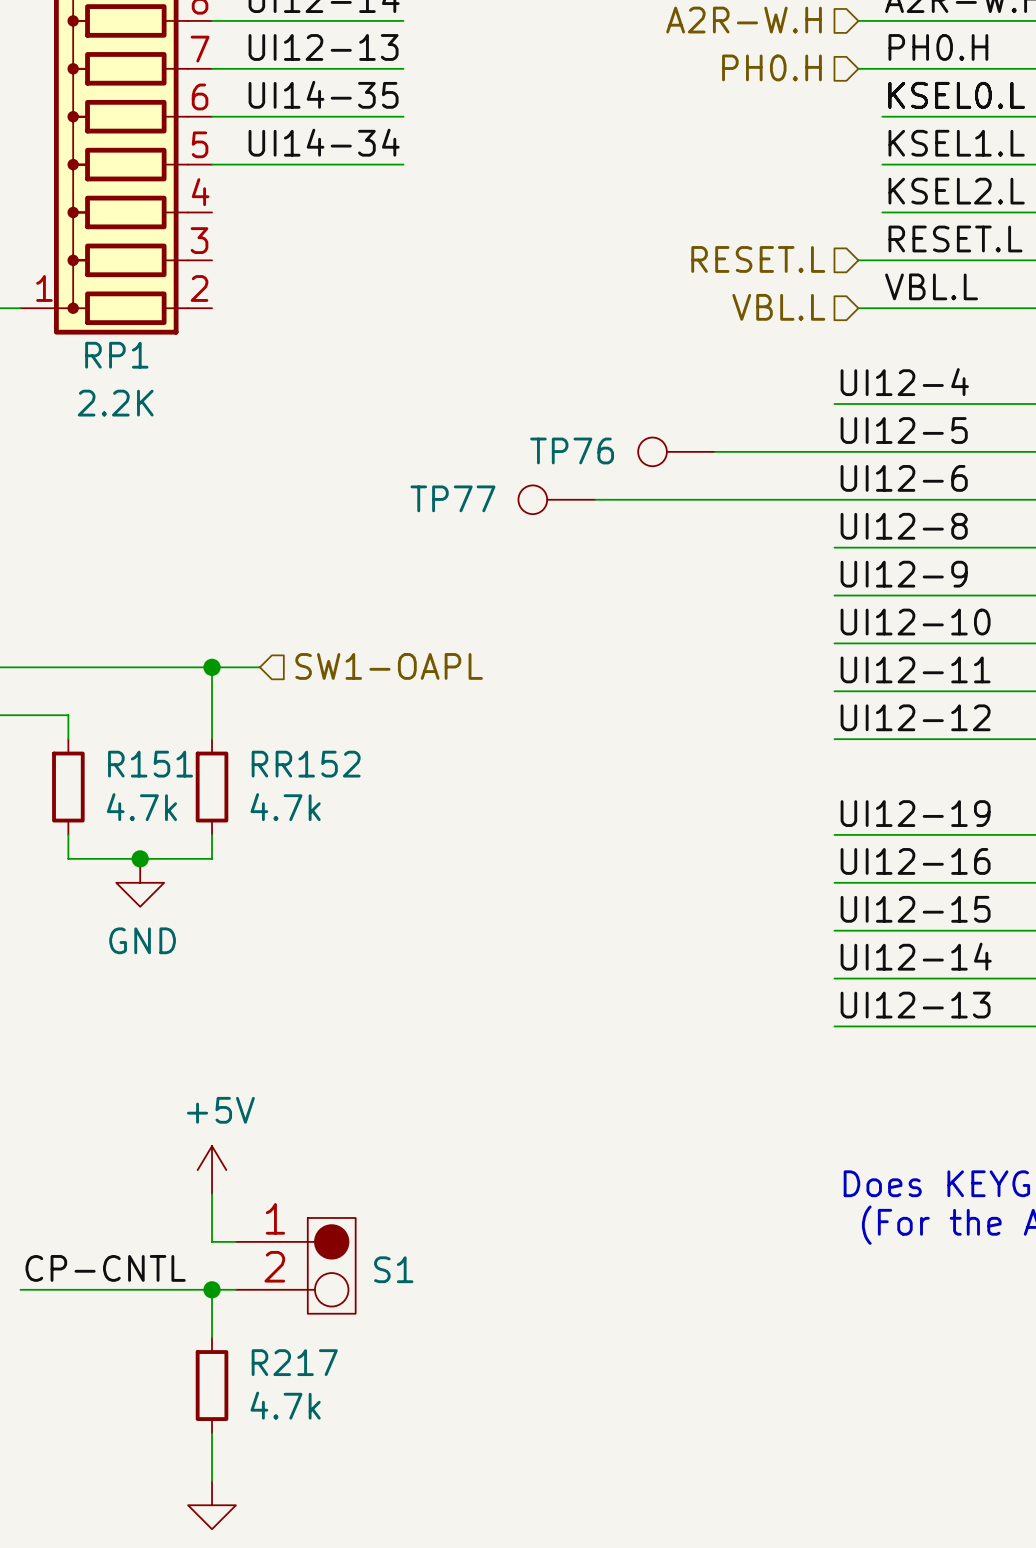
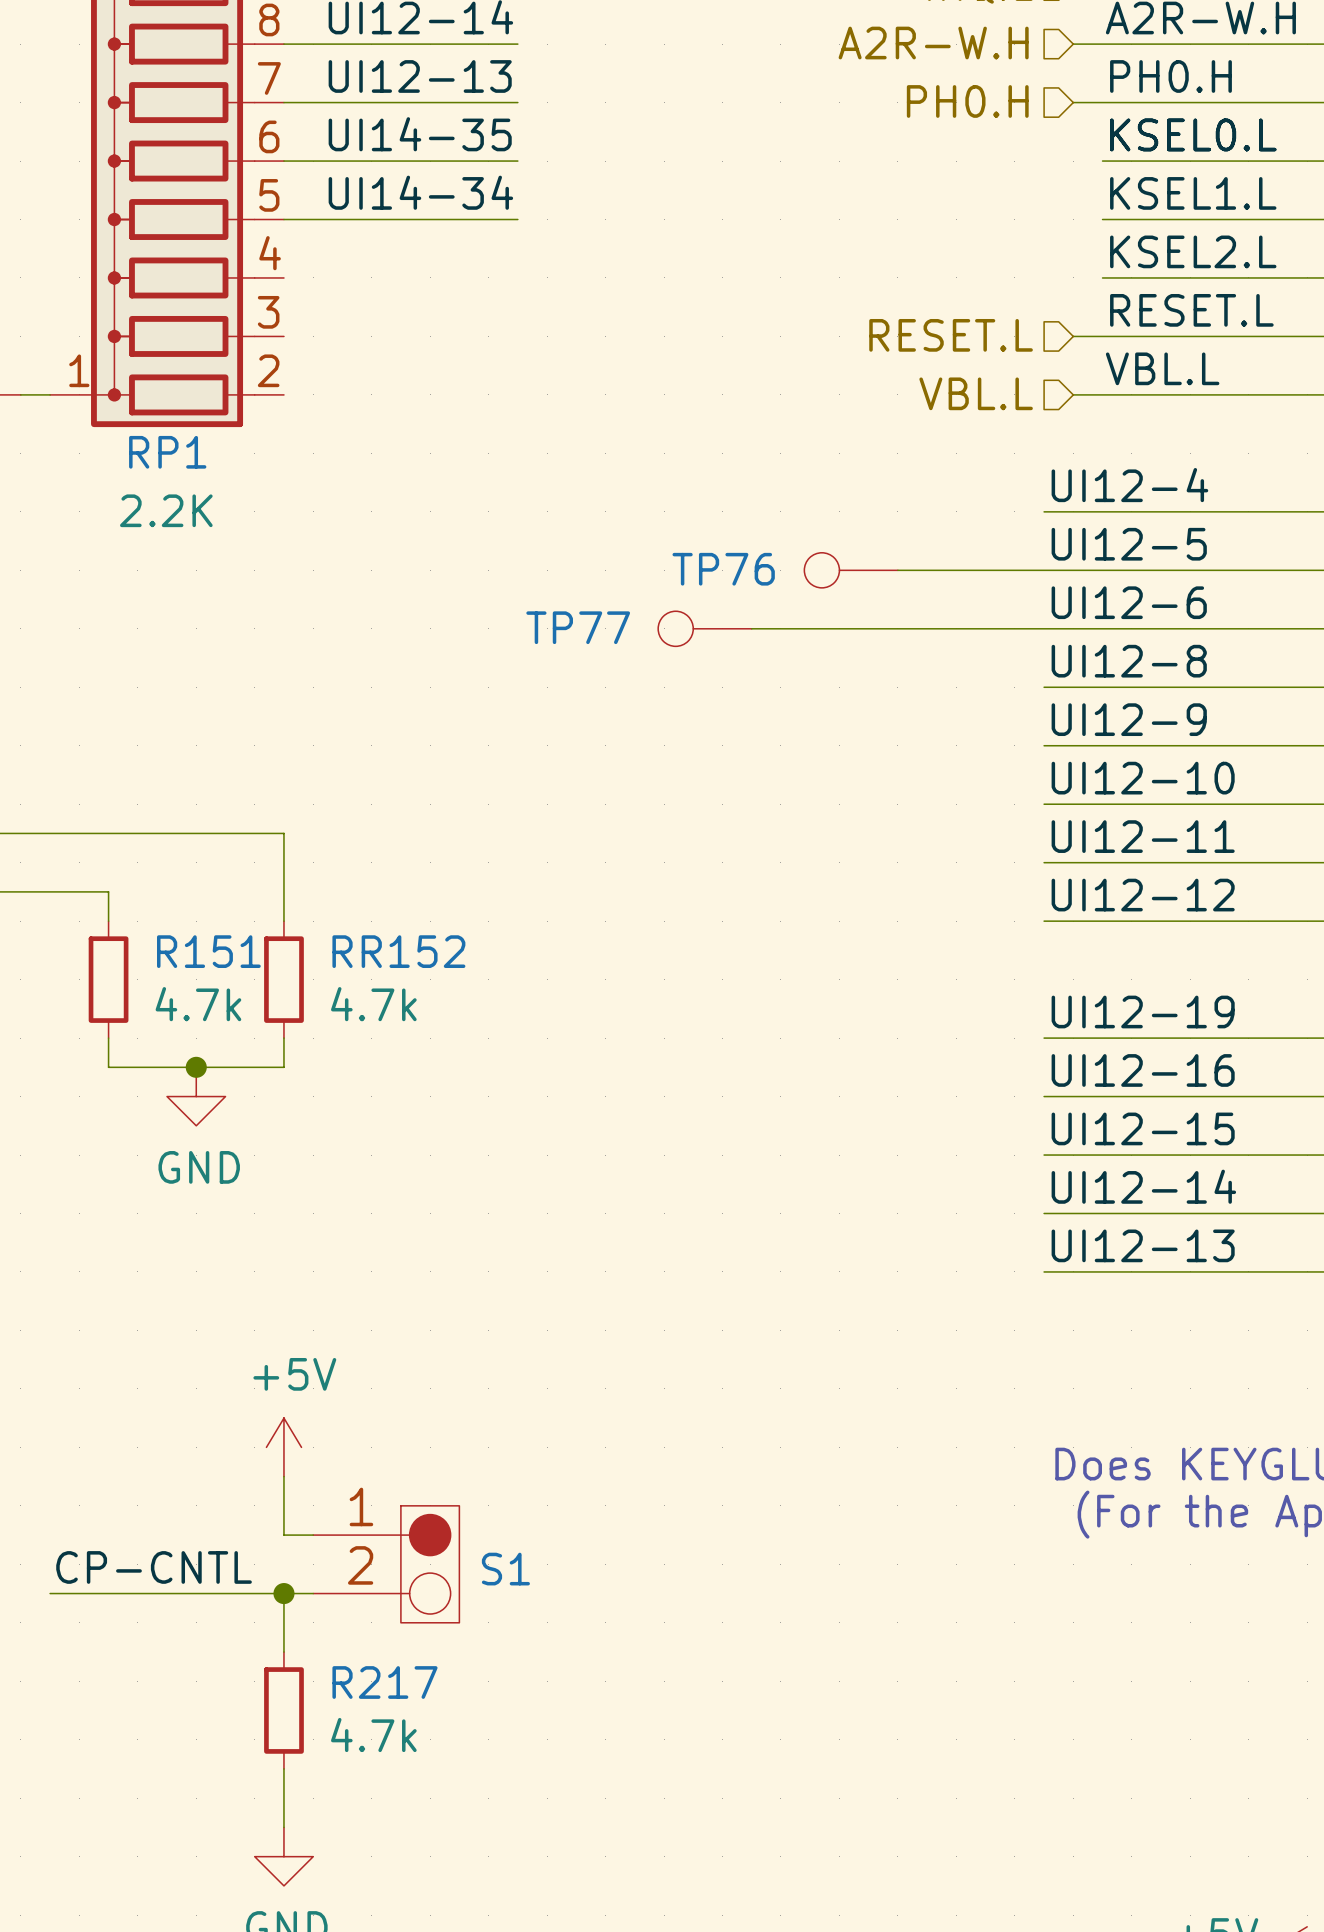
hierarchical label: SW1-OAPL (389, 666) -> none
wire: (212, 667) (259, 667) -> none
junction: (212, 667) -> none

